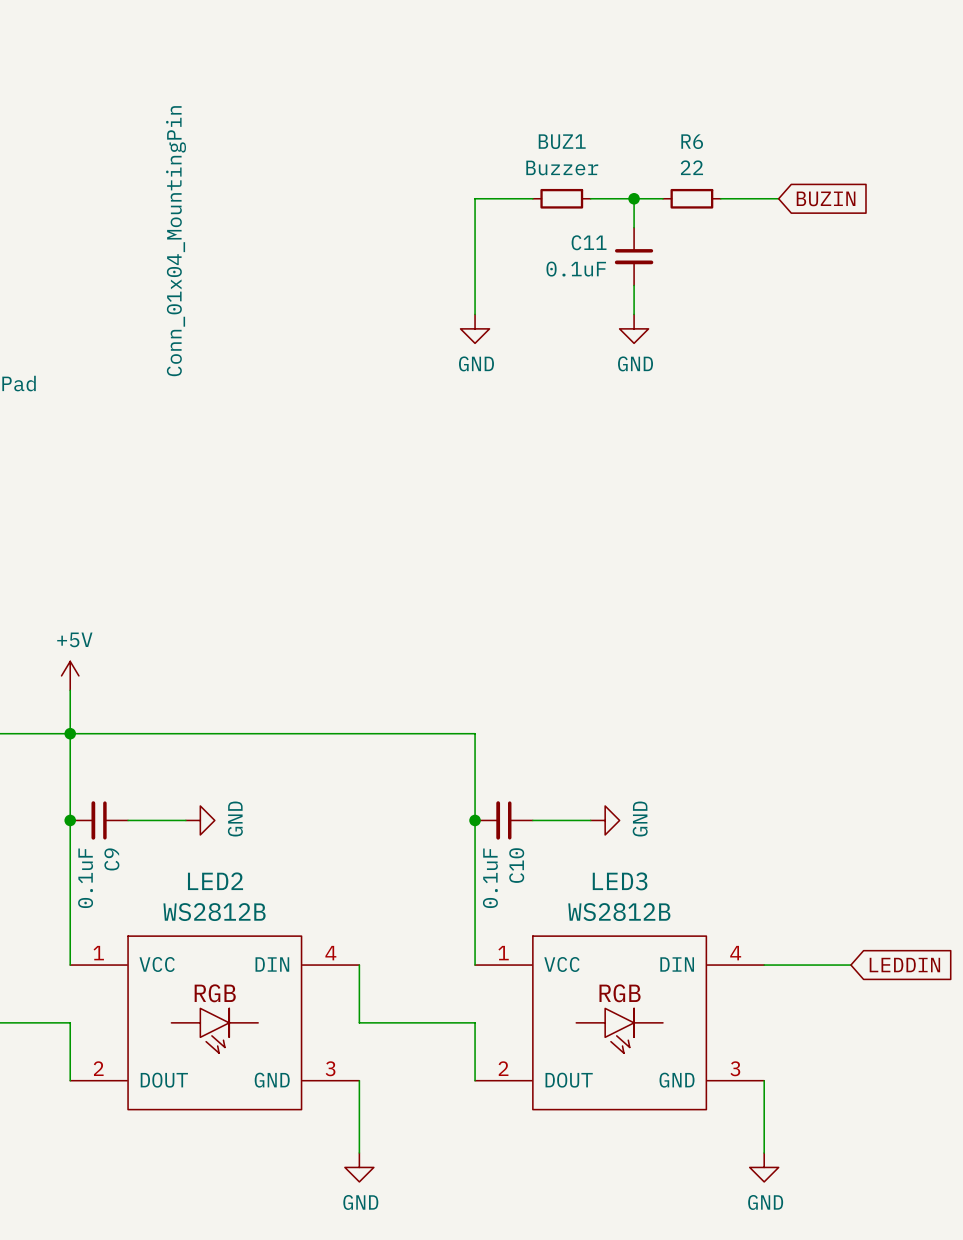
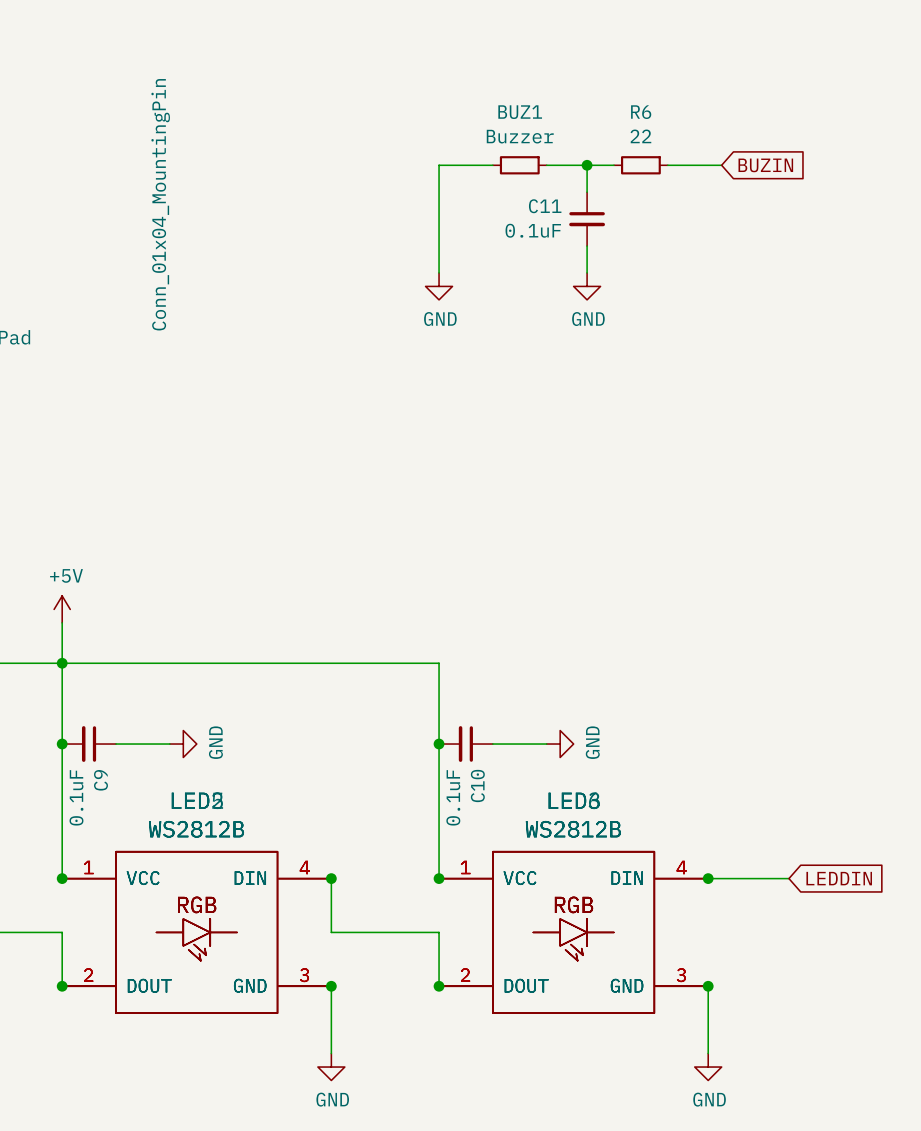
junction: none -> (62, 878)
junction: none -> (331, 878)
junction: none -> (439, 878)
junction: none -> (708, 878)
part: none -> WS2812B (196, 932)
part: none -> WS2812B (573, 932)
junction: none -> (62, 986)
junction: none -> (331, 986)
junction: none -> (439, 986)
junction: none -> (708, 986)

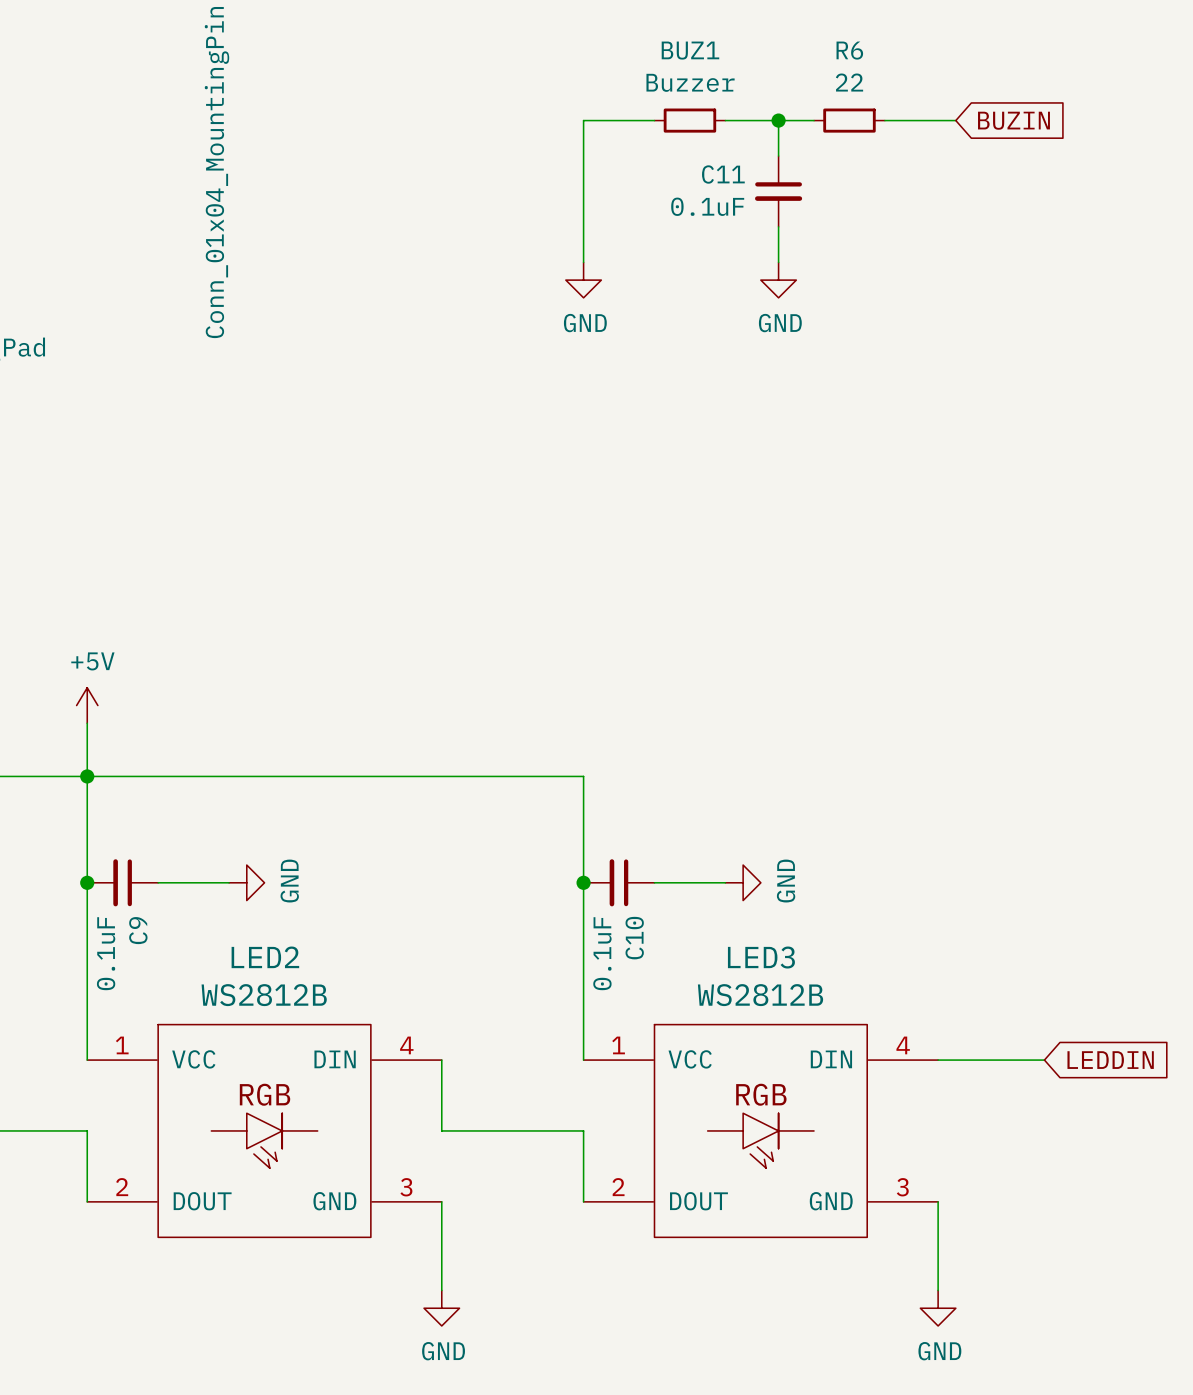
junction: (62, 878) -> none
junction: (331, 878) -> none
junction: (439, 878) -> none
junction: (708, 878) -> none
part: WS2812B (196, 932) -> none
part: WS2812B (573, 932) -> none
junction: (62, 986) -> none
junction: (331, 986) -> none
junction: (439, 986) -> none
junction: (708, 986) -> none

